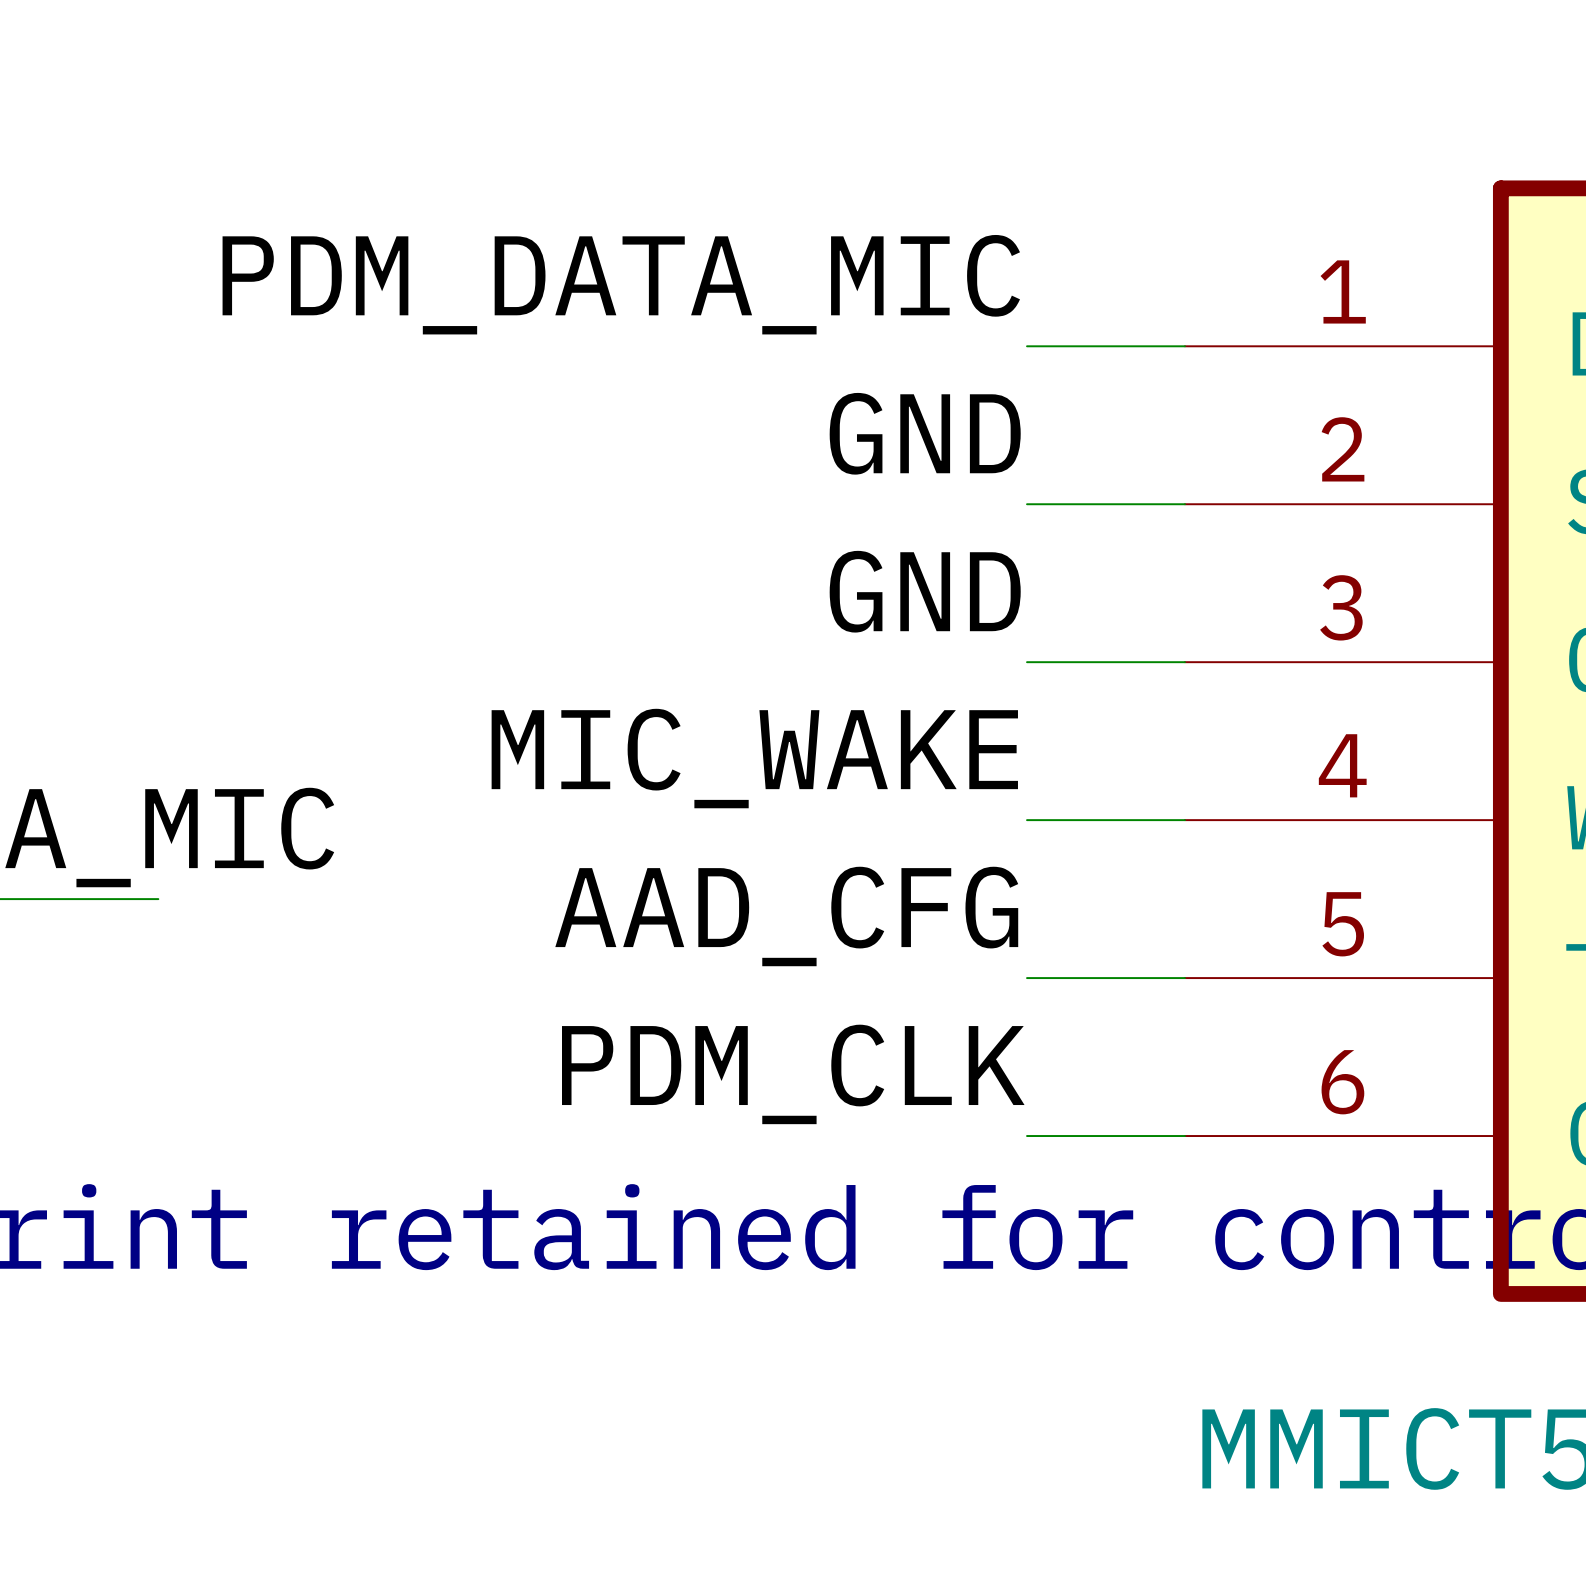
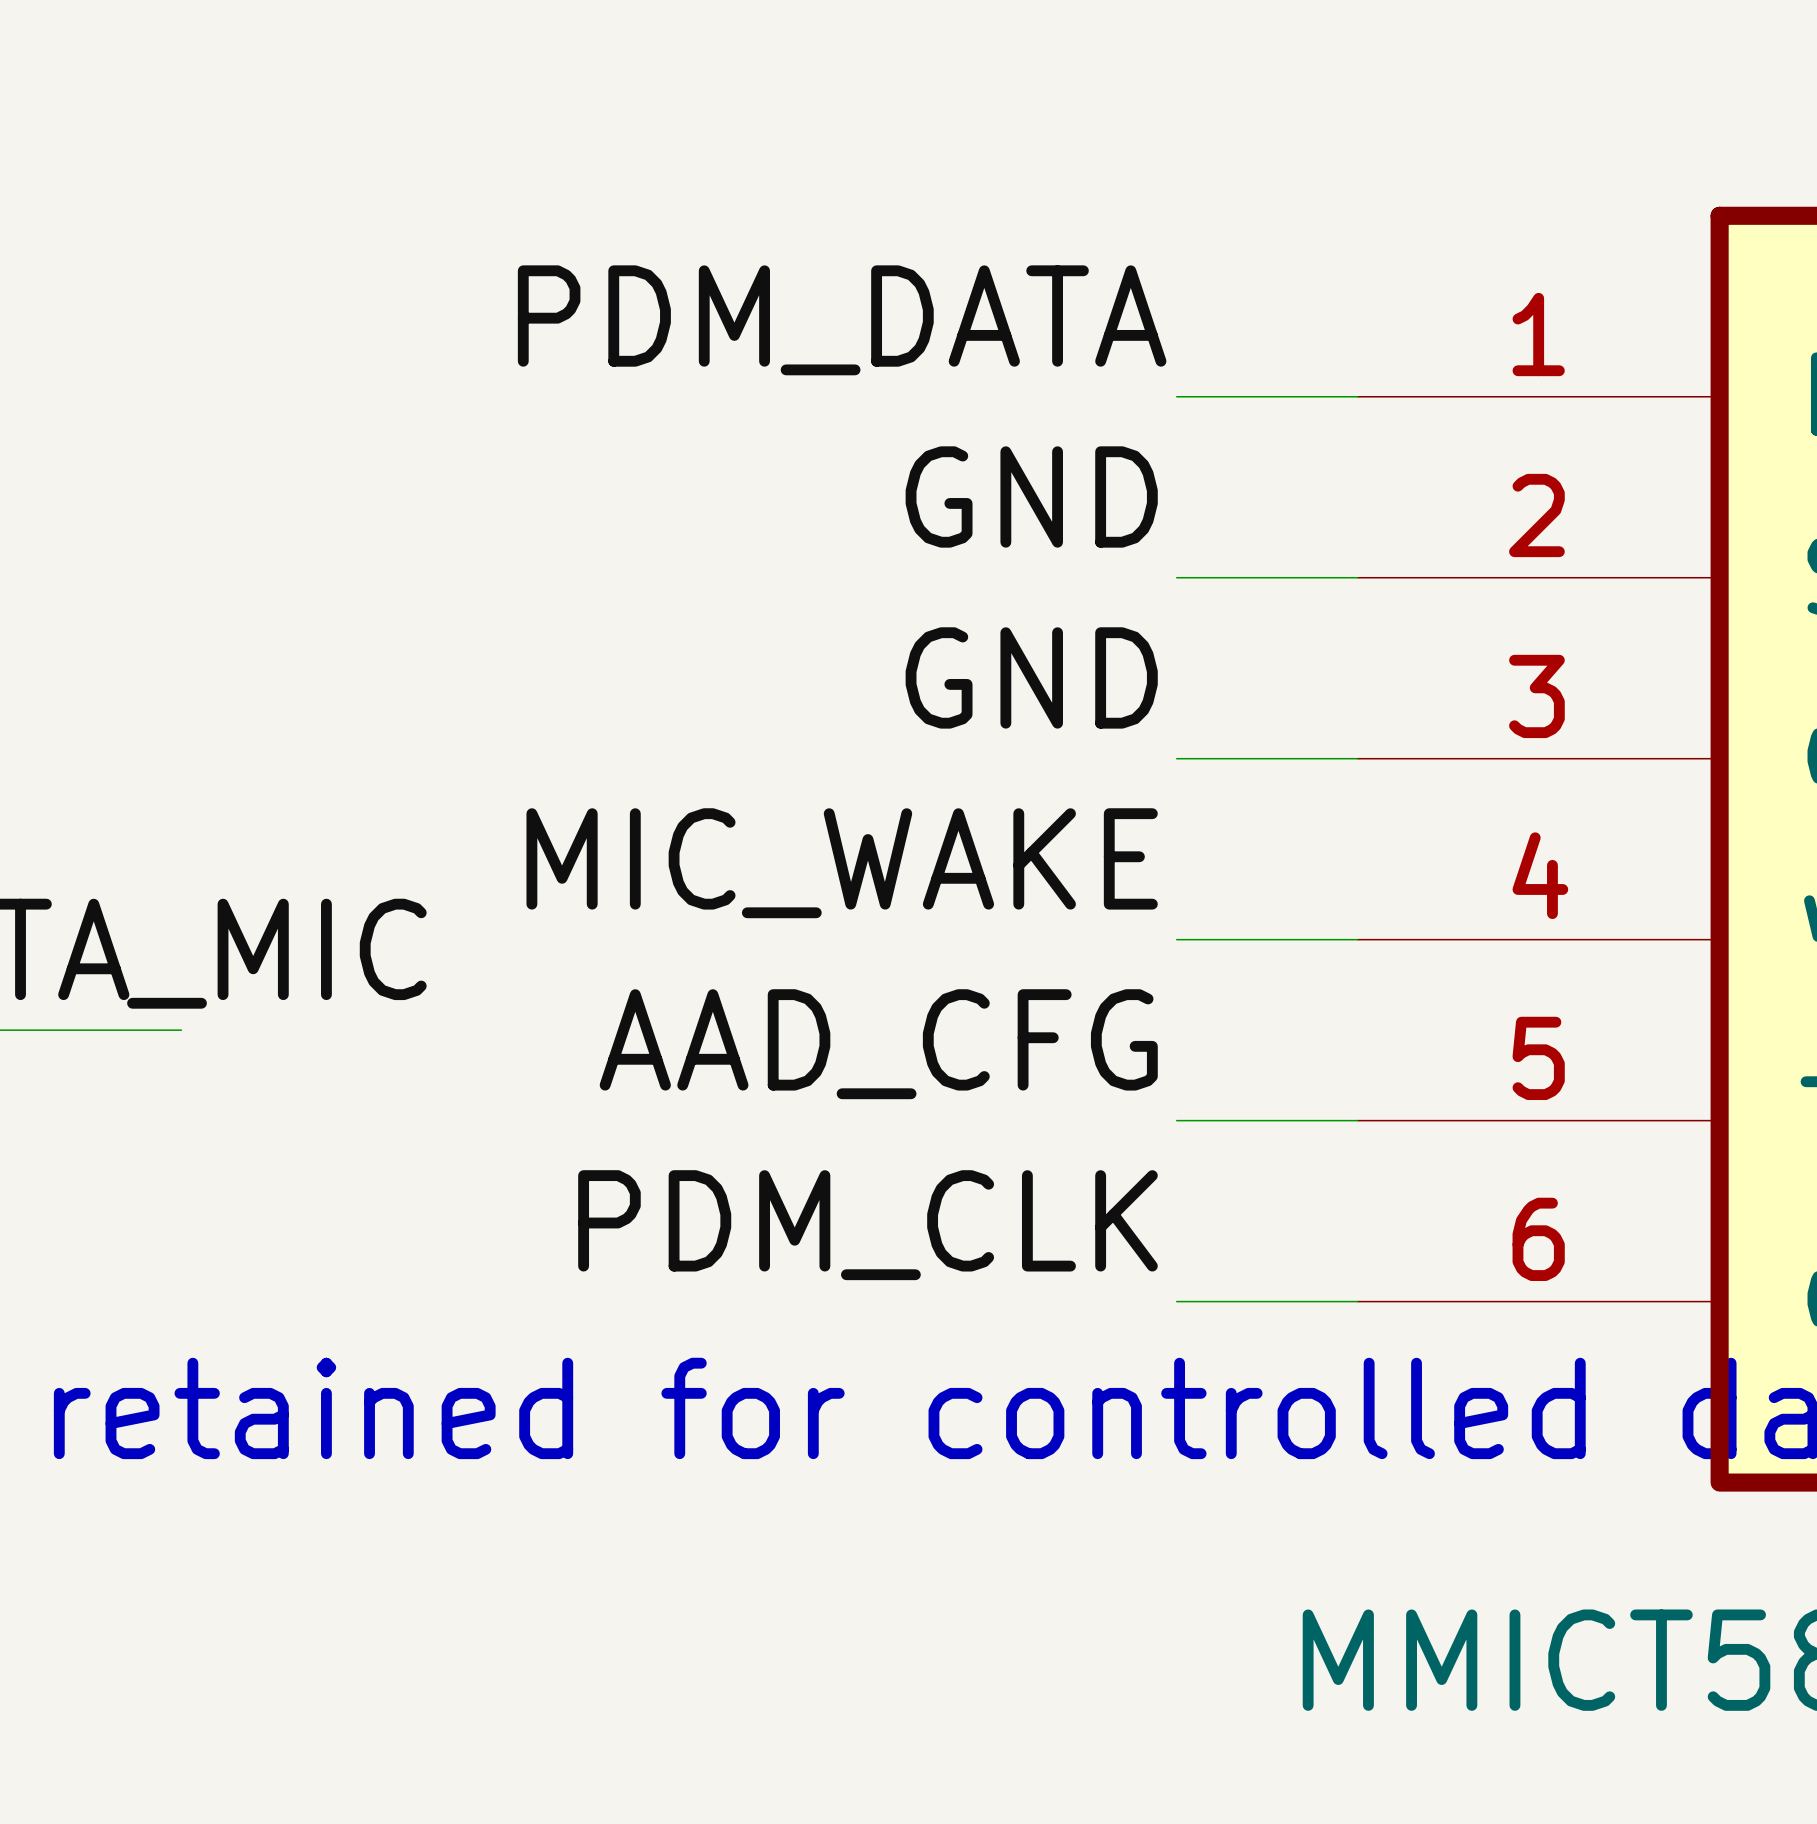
label: PDM_DATA_MIC (621, 284) -> PDM_DATA (842, 320)

